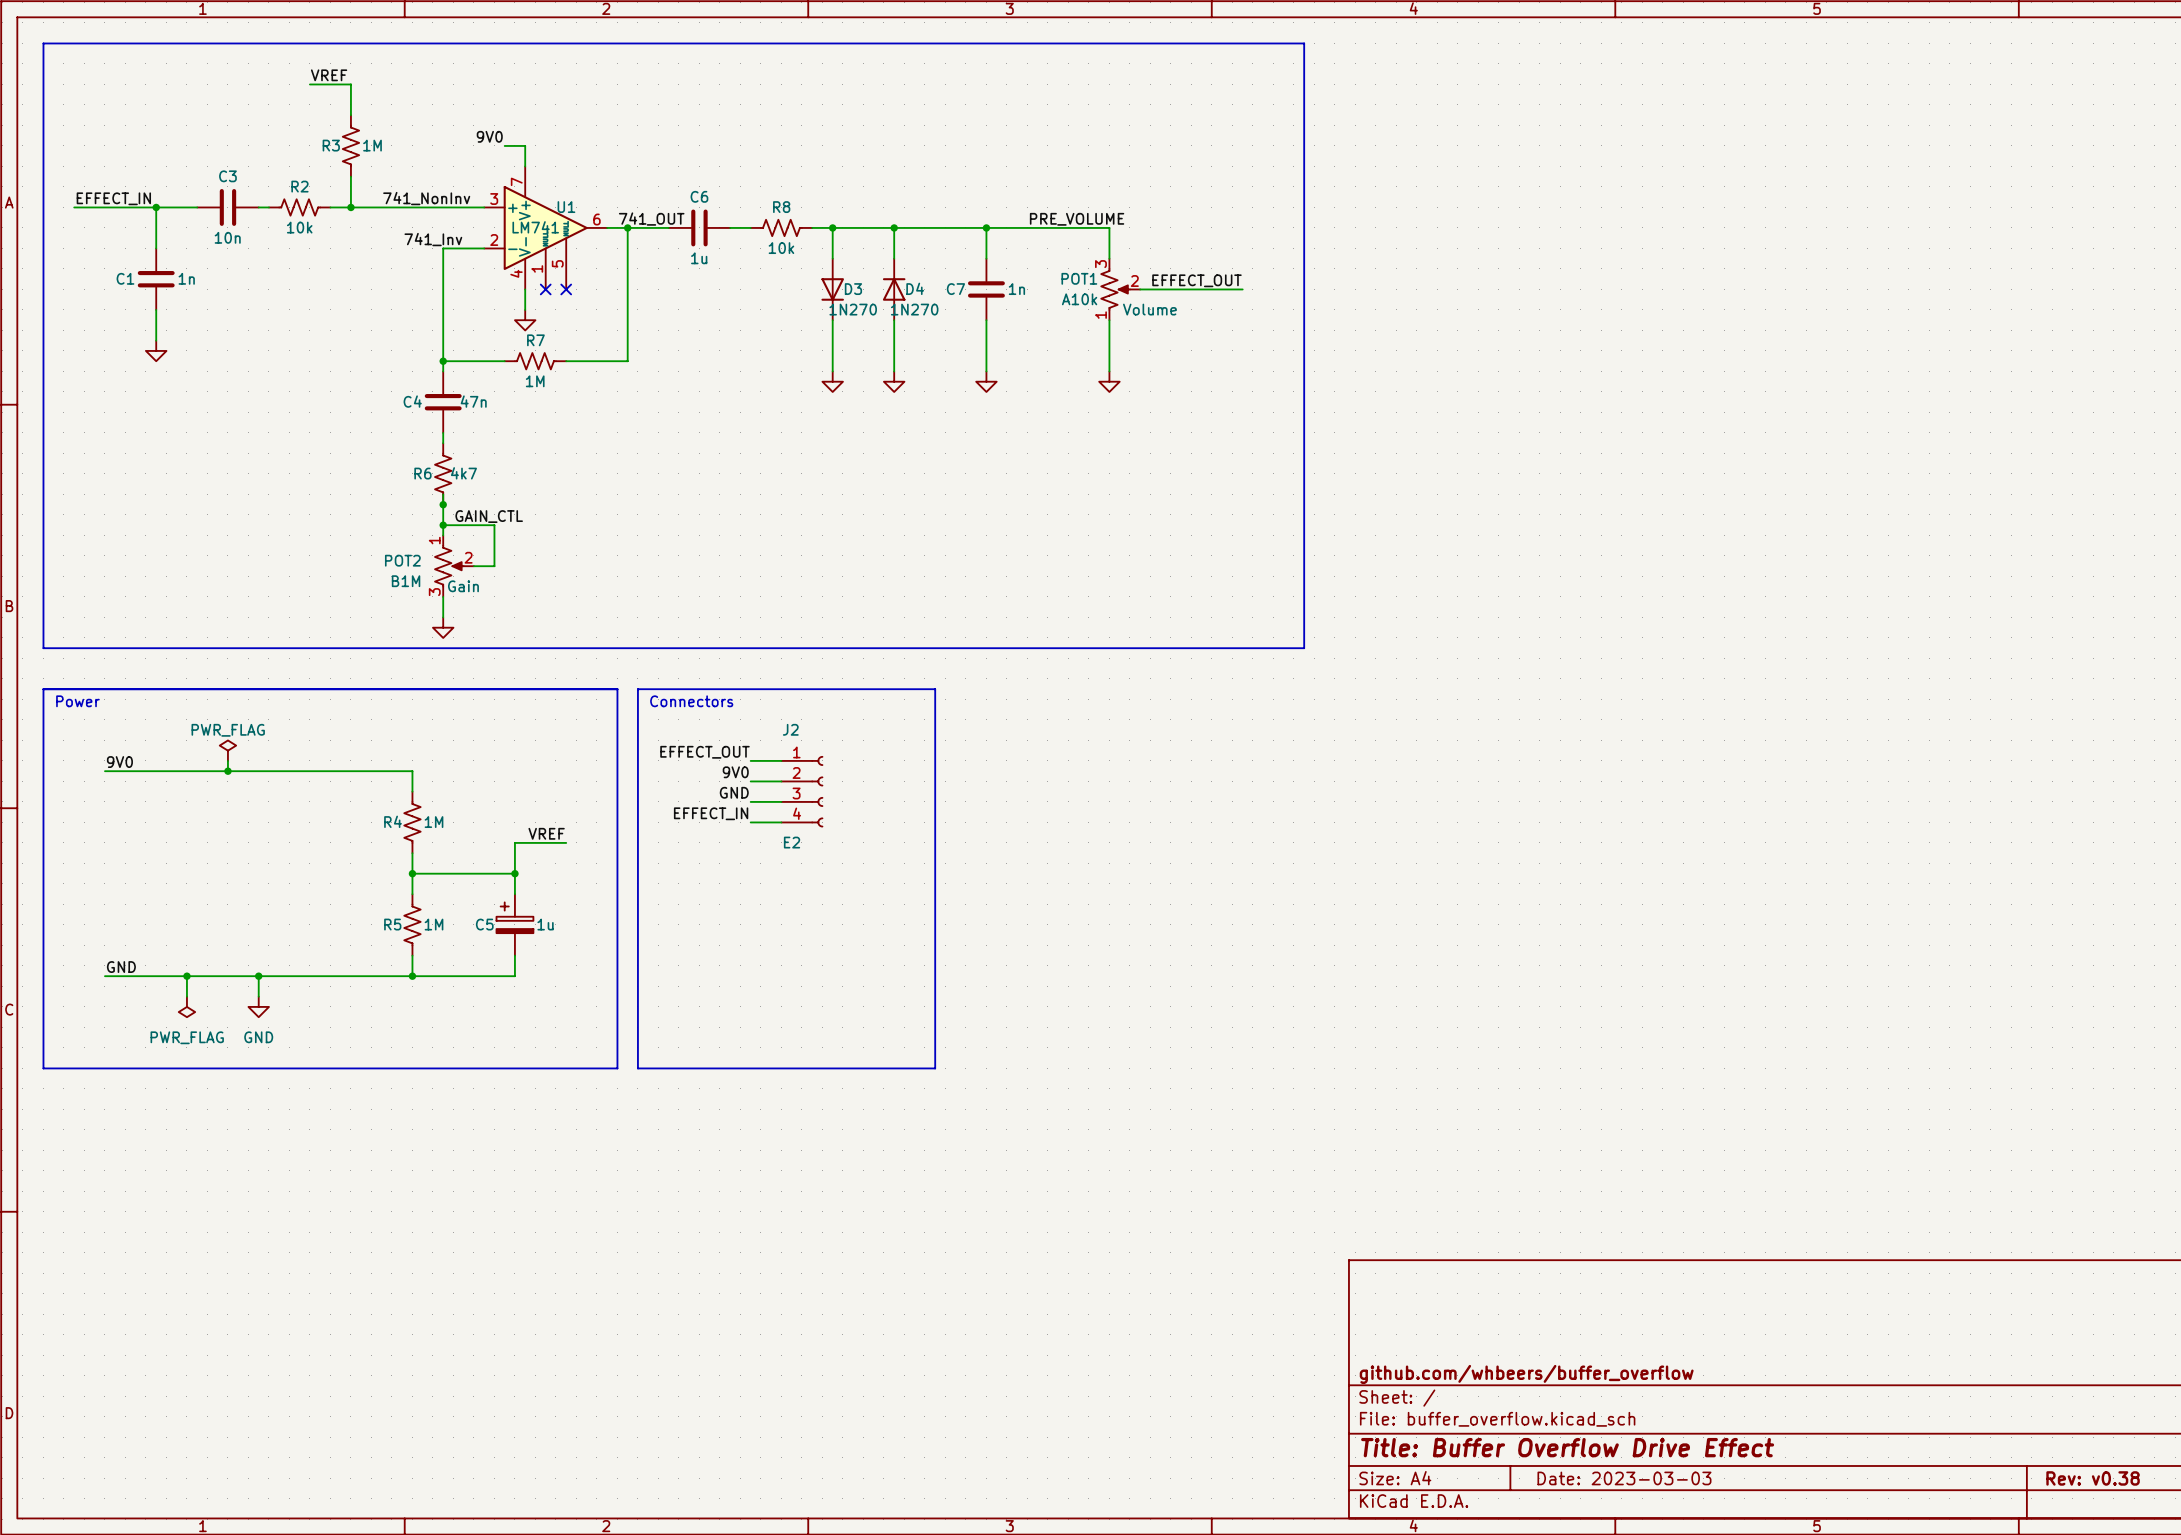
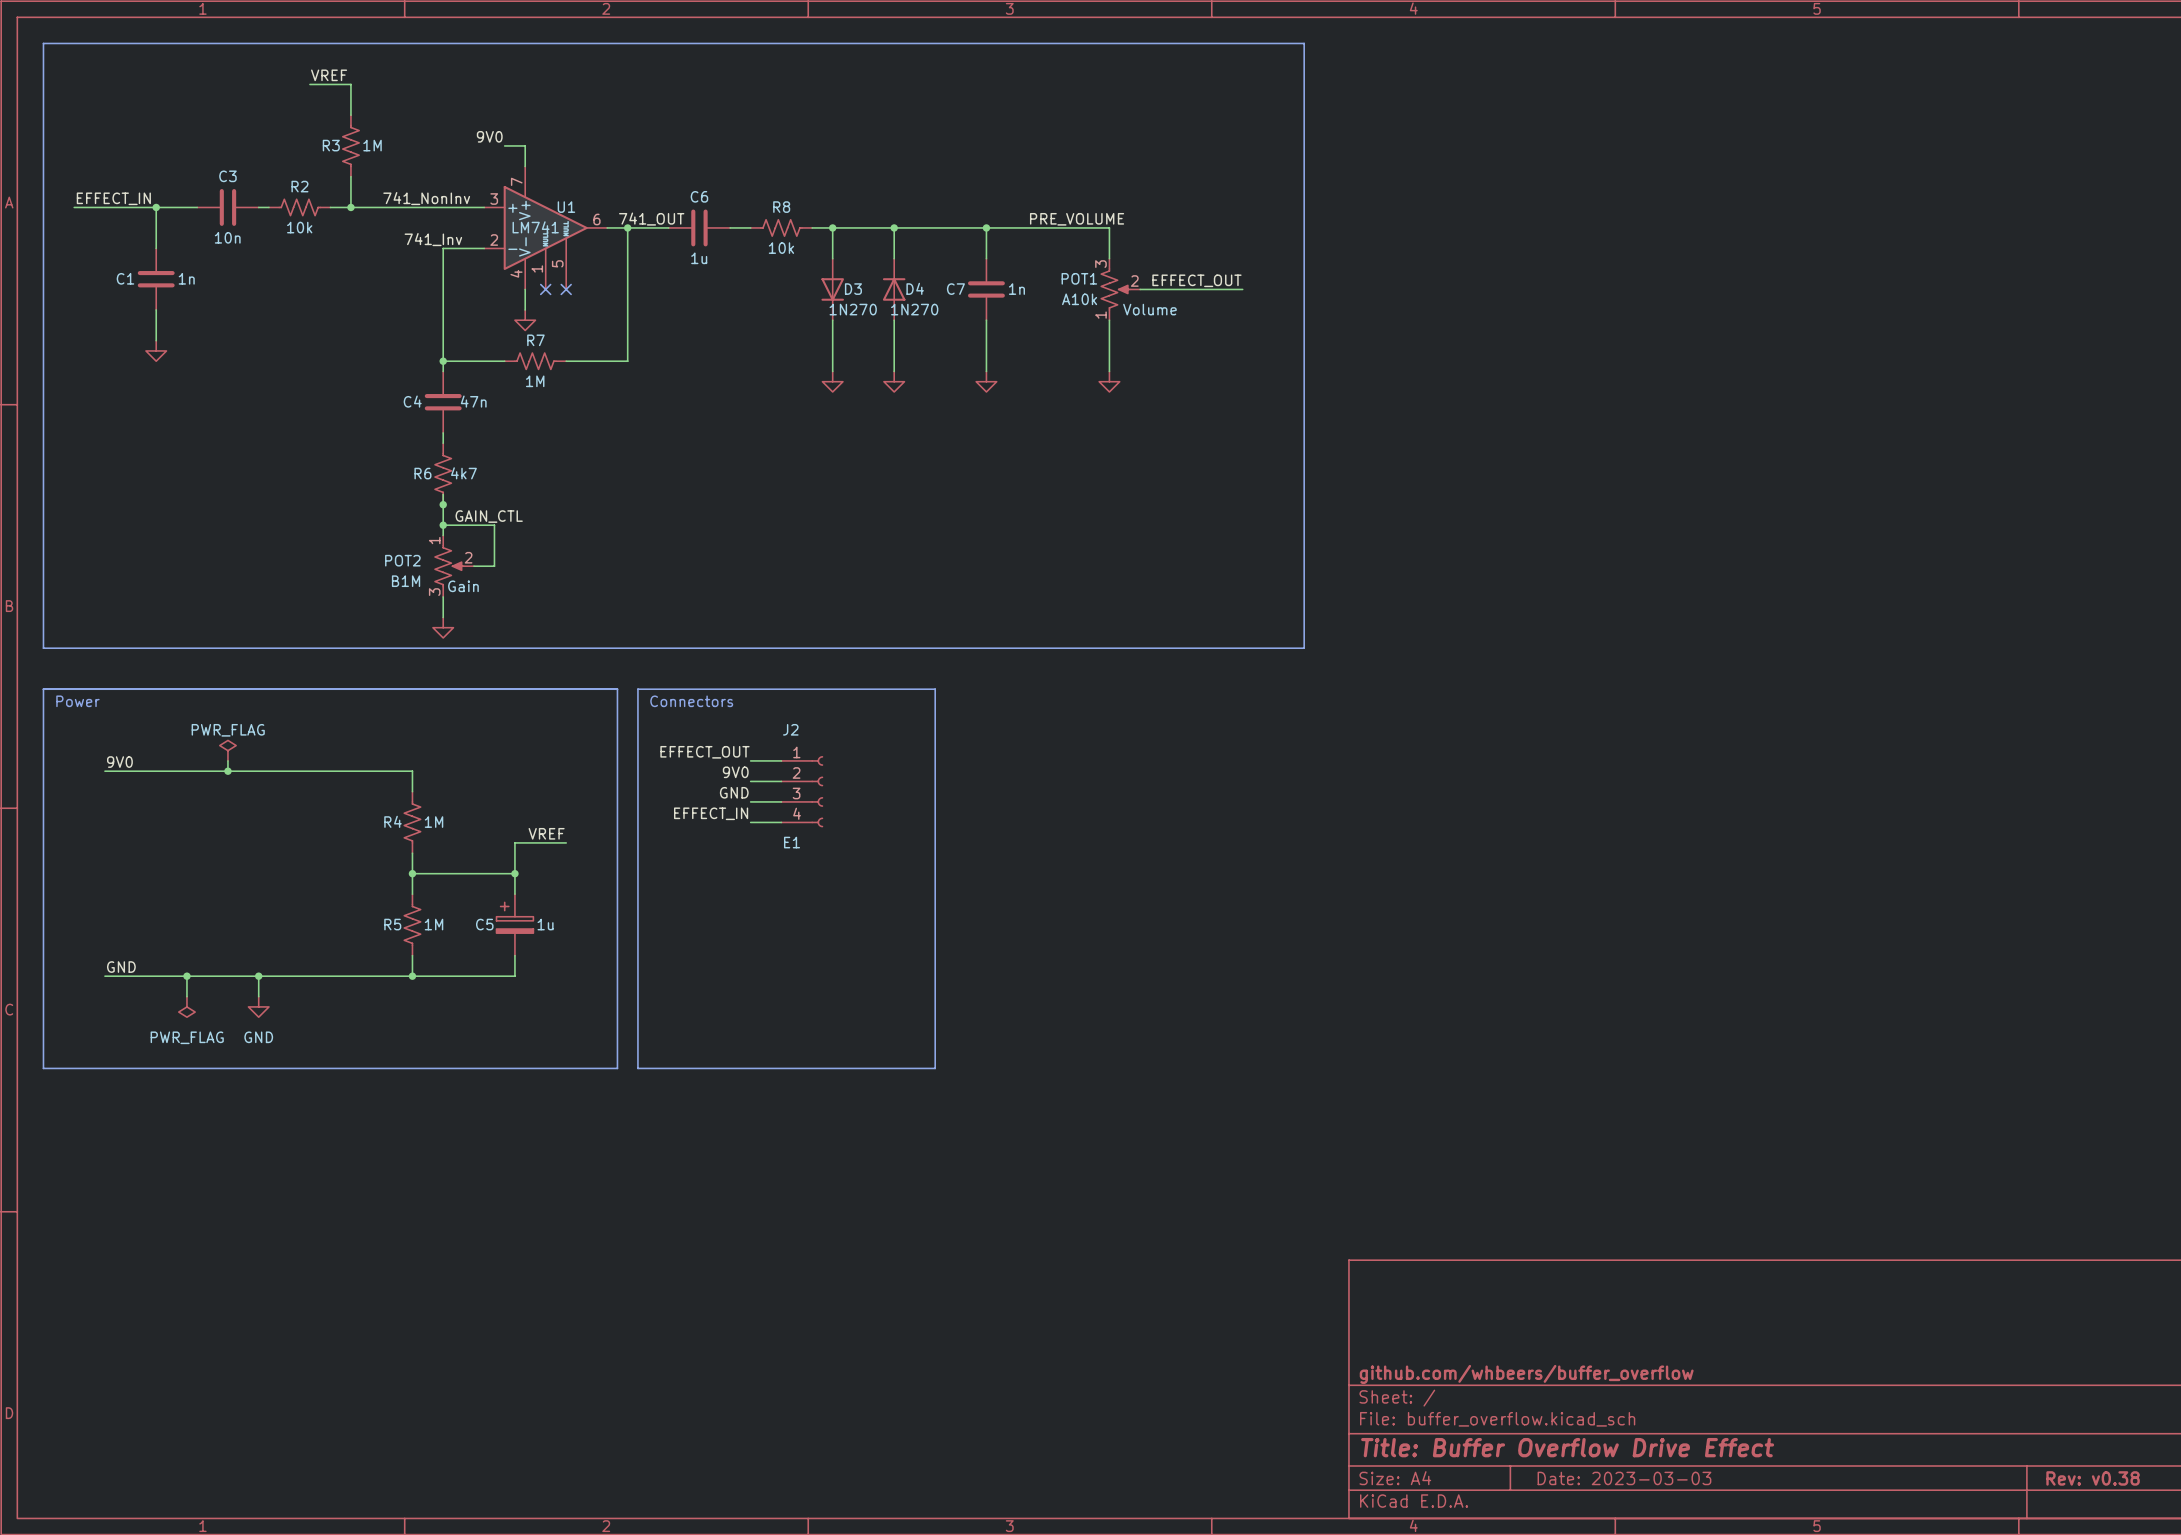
J2 value: E2 (792, 842) -> E1 (792, 842)

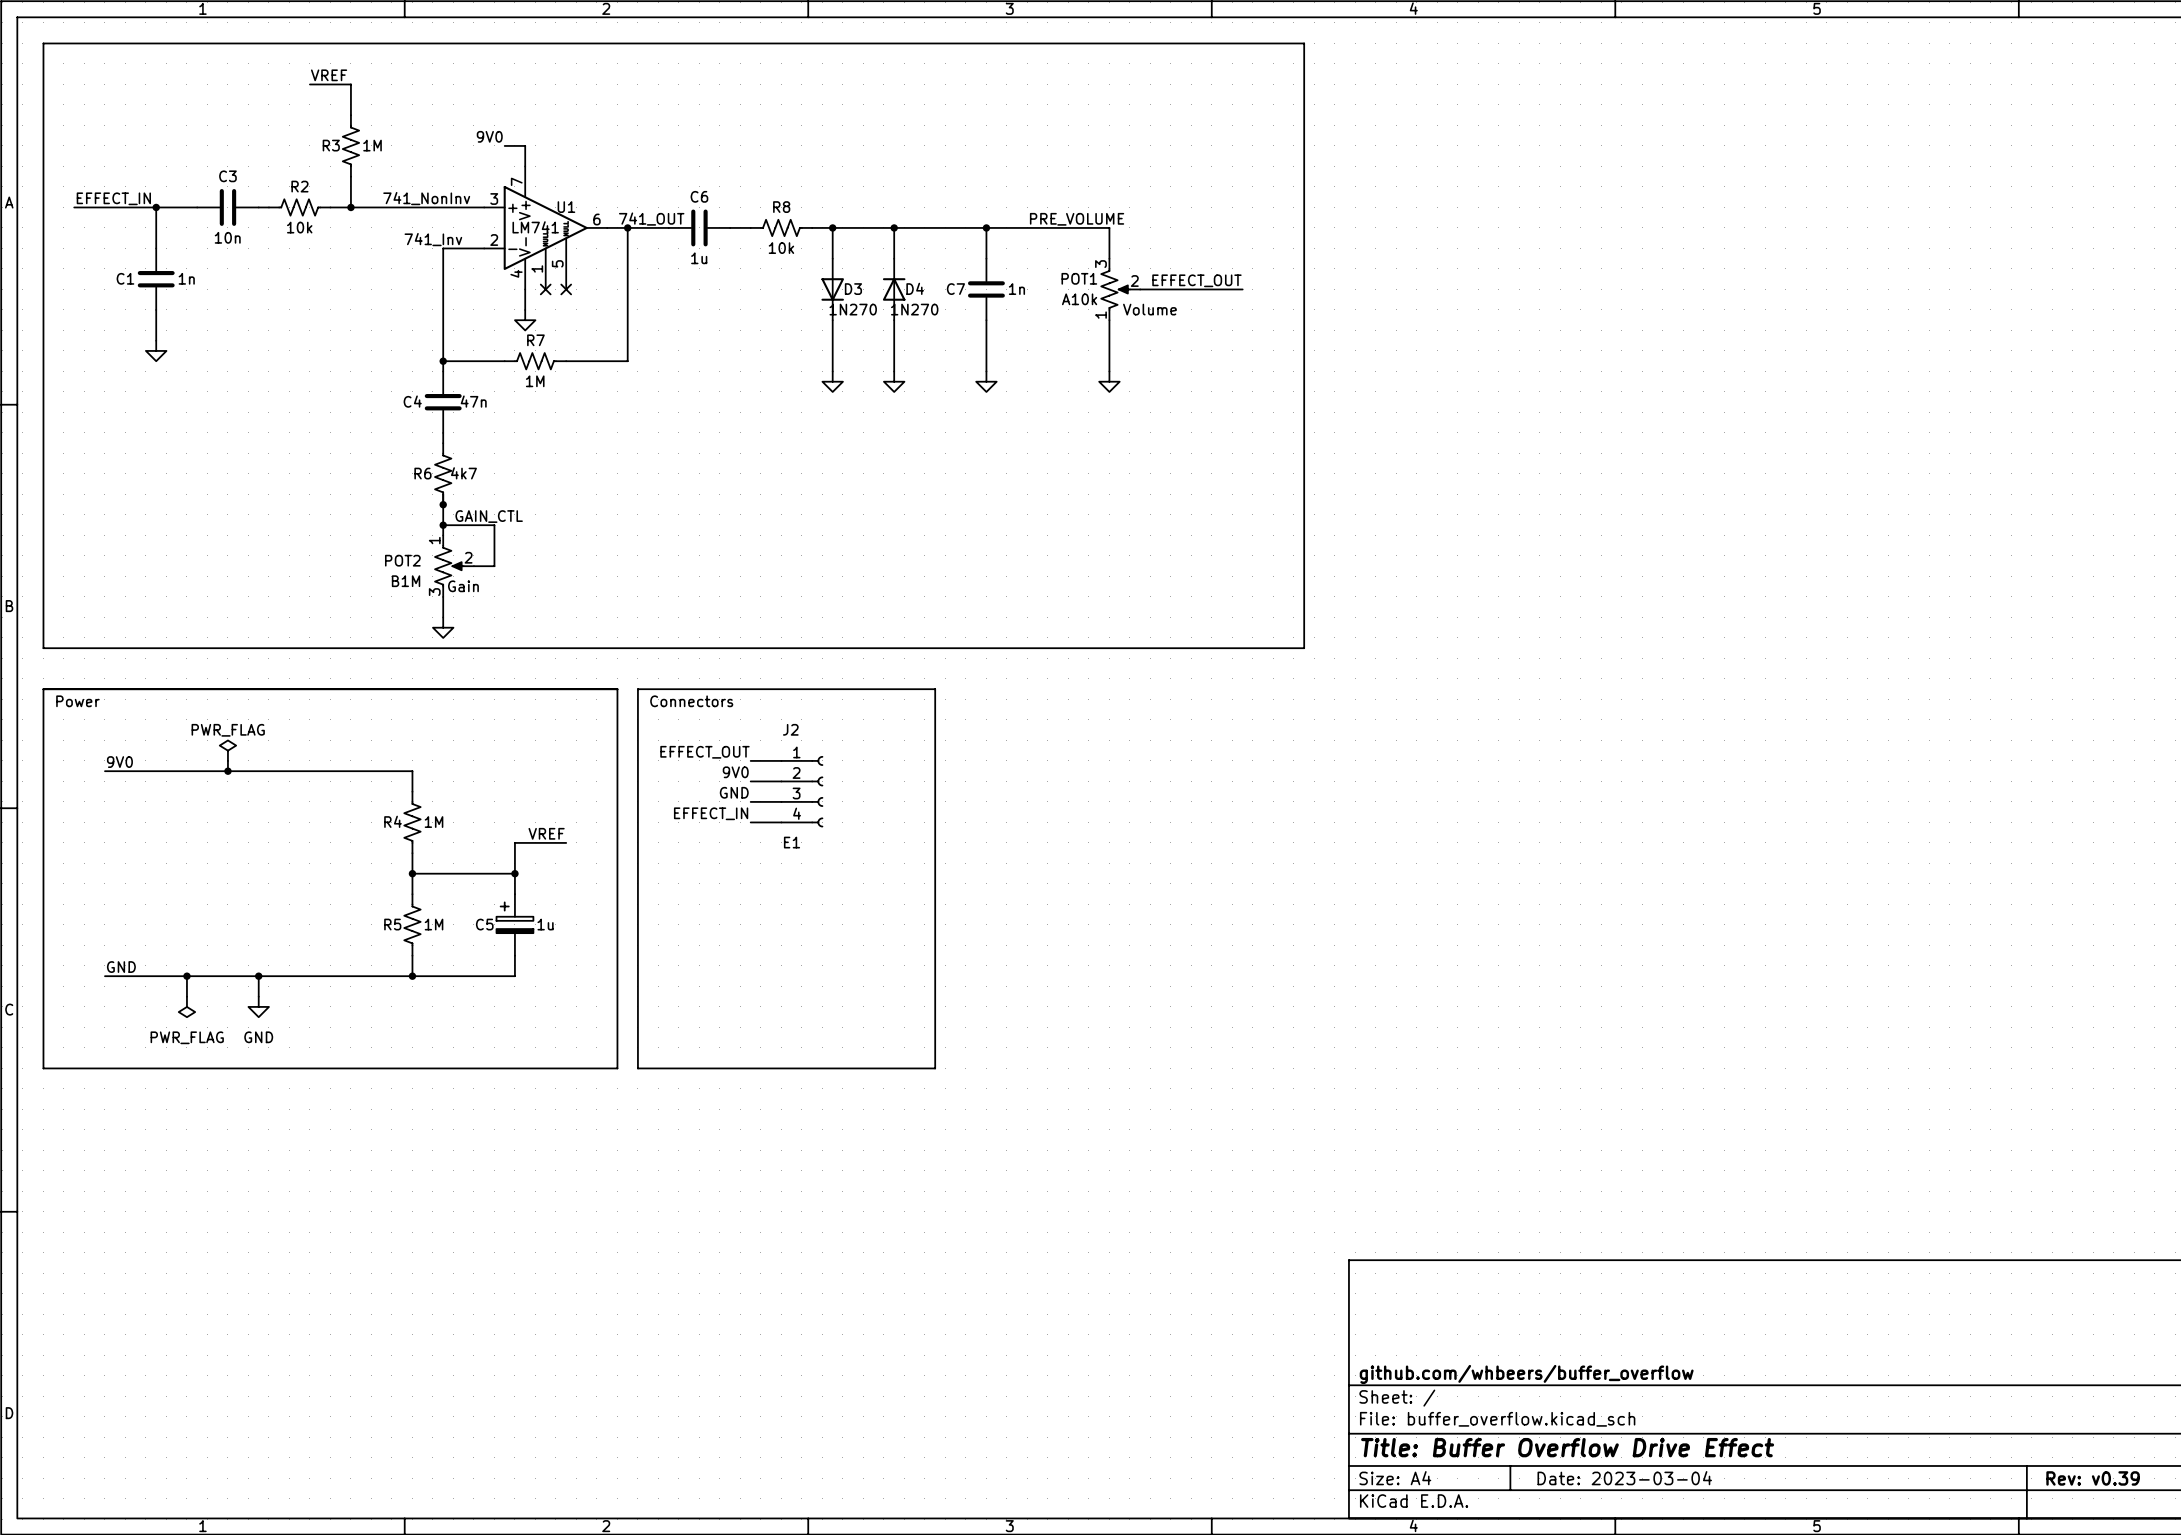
title block: Date: 2023-03-03 (1624, 1478) -> Date: 2023-03-04 (1624, 1478)
title block: Rev: v0.38 (2093, 1478) -> Rev: v0.39 (2093, 1478)

